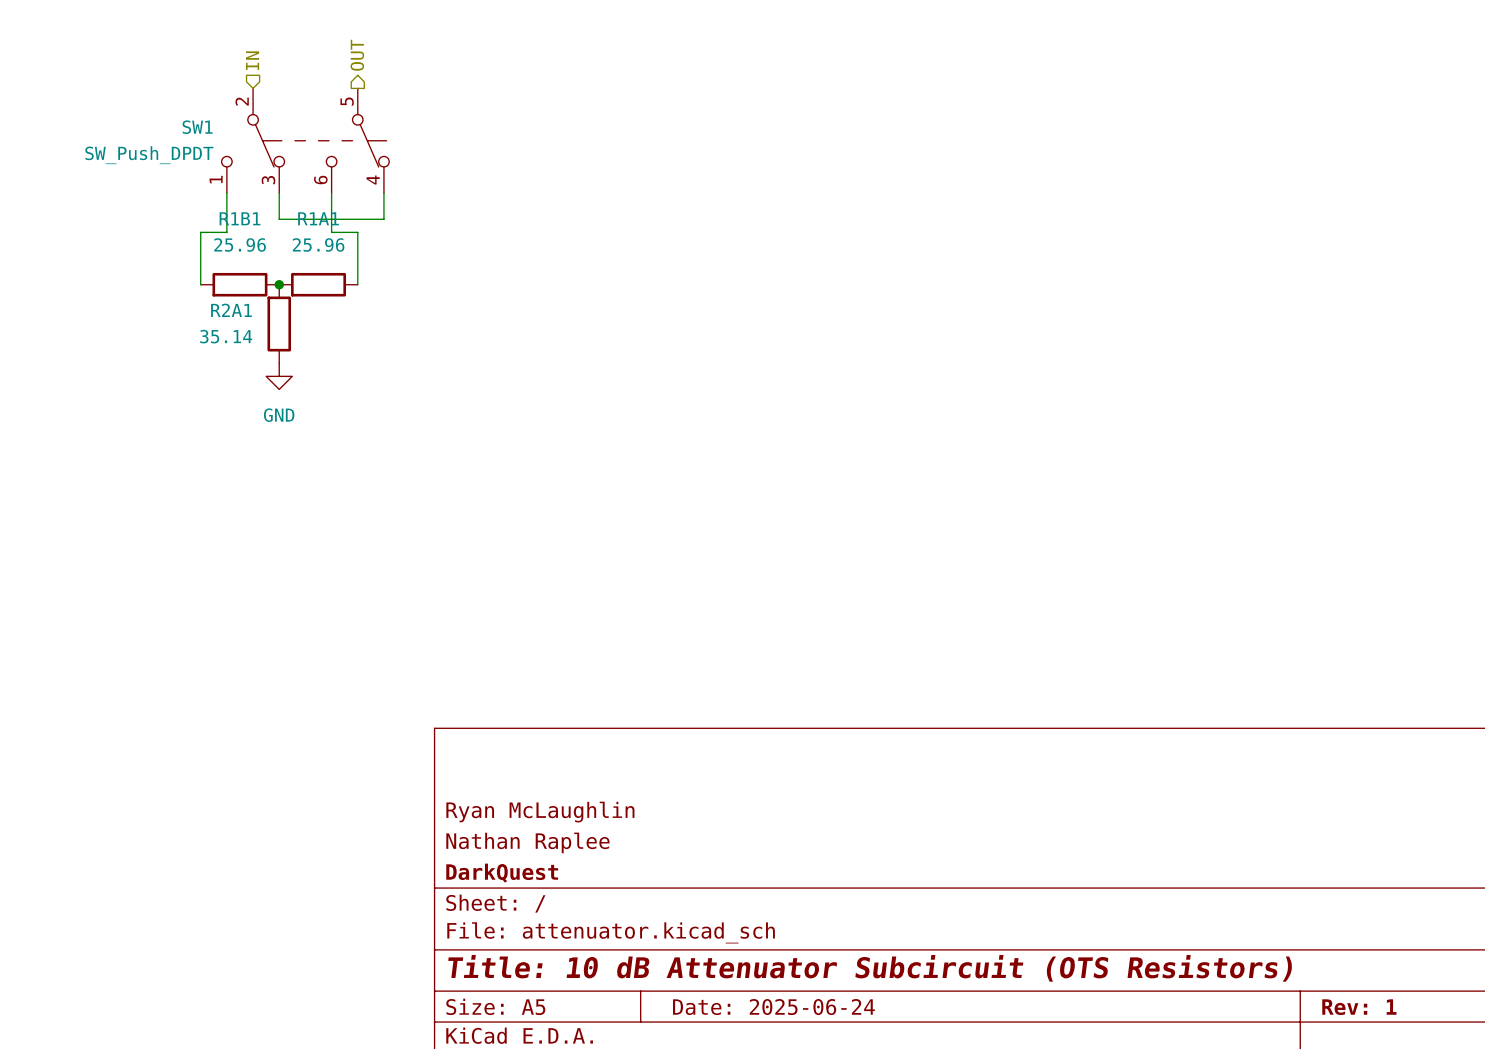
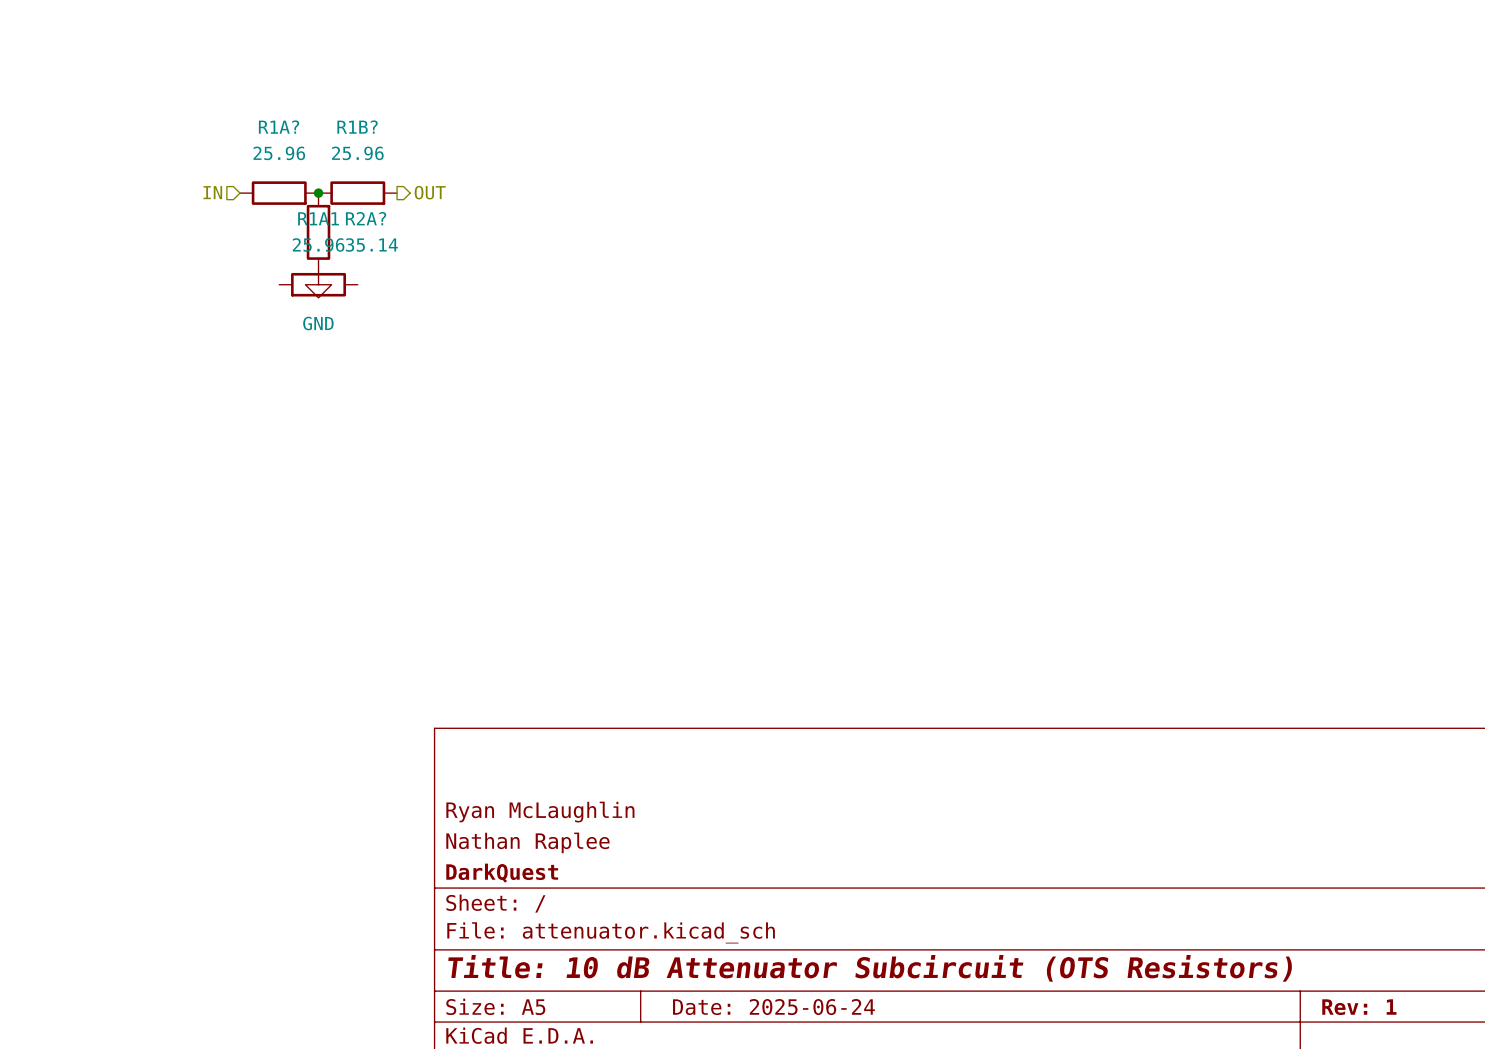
hierarchical label rotation: 0° (357, 55) -> 90° clockwise (430, 192)
hierarchical label position: OUT (357, 55) -> OUT (430, 192)
hierarchical label rotation: 0° (252, 60) -> 90° counterclockwise (212, 192)
hierarchical label position: IN (252, 60) -> IN (212, 192)
SW1: SW_Push_DPDT (305, 140) -> none
wire: (226, 193) (226, 232) (200, 232) (200, 284) -> none
wire: (279, 193) (279, 219) (383, 219) (383, 193) -> none
R1A?: none -> 25.96 (279, 193)
junction: none -> (318, 193)
wire: (331, 193) (331, 232) (357, 232) (357, 284) -> none
R1B?: none -> 25.96 (357, 193)
R2A?: none -> 35.14 (318, 232)
R1B1: 25.96 (239, 284) -> none
junction: (279, 284) -> none
R2A1: 35.14 (279, 324) -> none
power symbol position: GND (279, 376) -> GND (318, 284)

